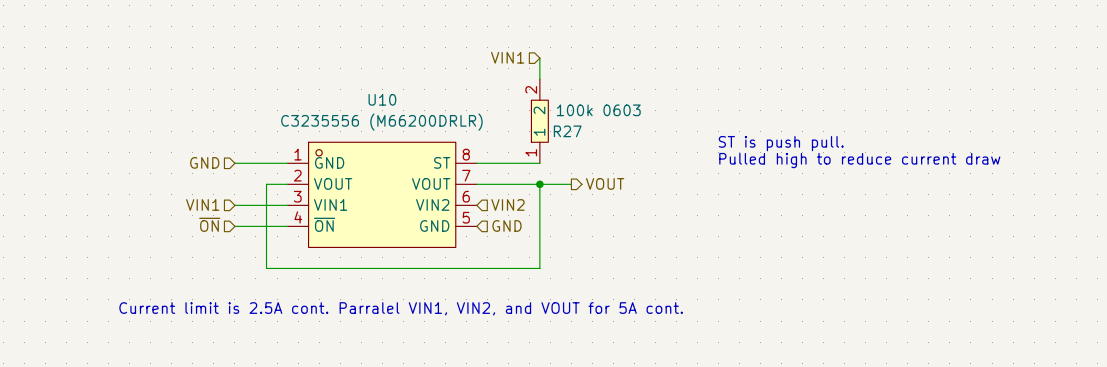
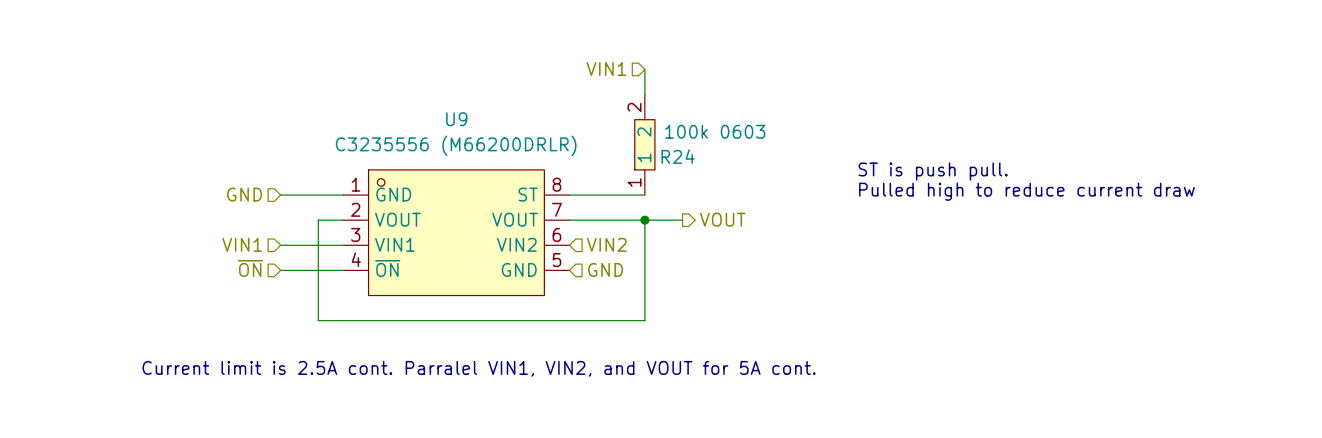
U10 name: U10 (382, 99) -> U9 (456, 119)
R27 name: R27 (567, 131) -> R24 (678, 156)

